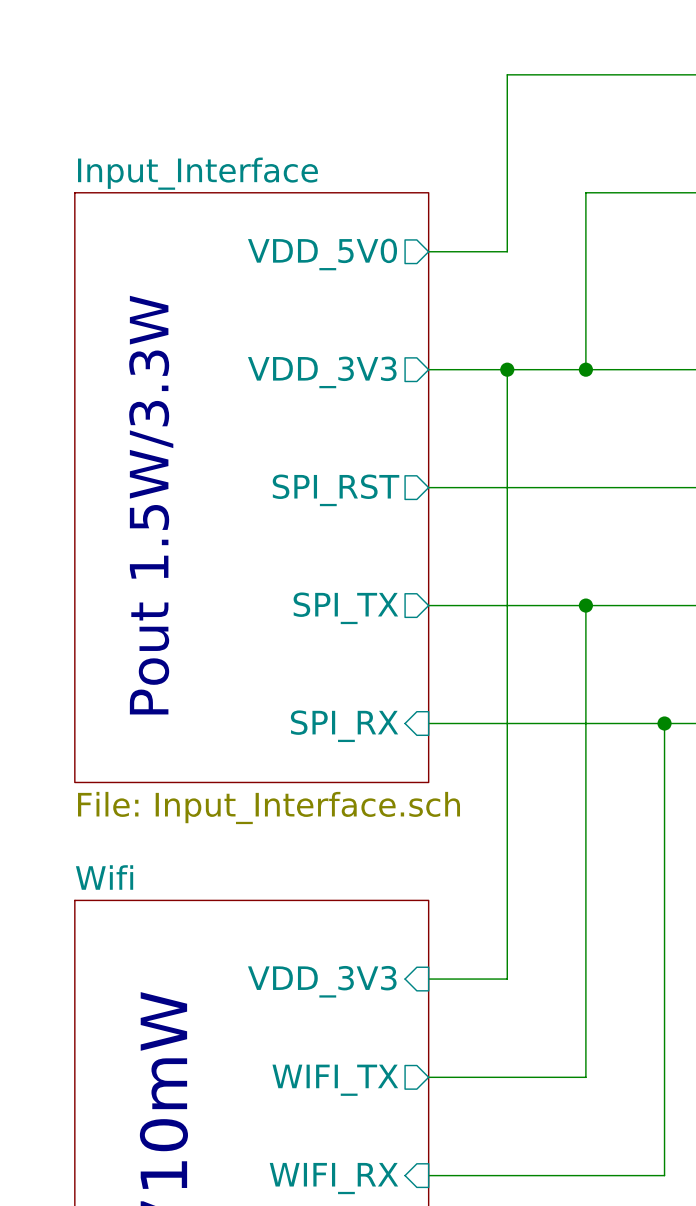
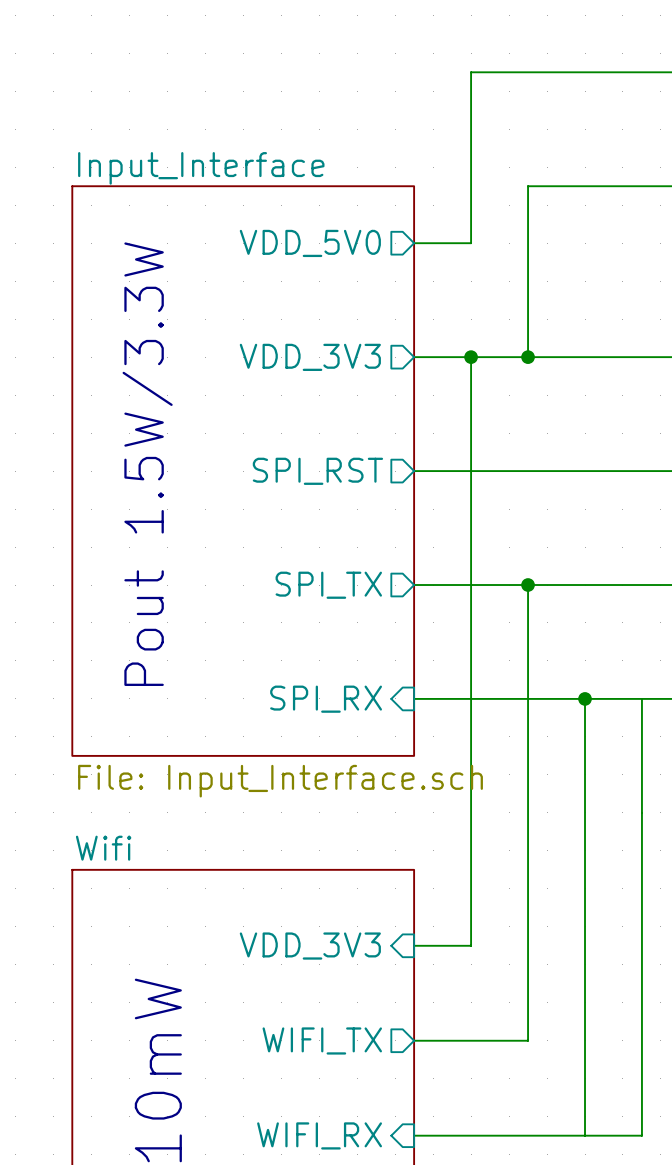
wire: (507, 74) (507, 251) (487, 251) -> (490, 72) (471, 72) (471, 243)
wire: (585, 192) (585, 369) -> (566, 186) (528, 186) (528, 357)
junction: none -> (471, 357)
wire: (507, 369) (507, 979) (487, 979) -> (471, 357) (471, 945)
junction: (507, 369) -> none
junction: none -> (528, 357)
junction: (585, 369) -> none
wire: (585, 605) (585, 1077) (546, 1077) -> (528, 585) (528, 1040)
junction position: (585, 605) -> (528, 585)
wire: none -> (585, 698) (585, 1135)
junction position: (664, 723) -> (585, 698)

